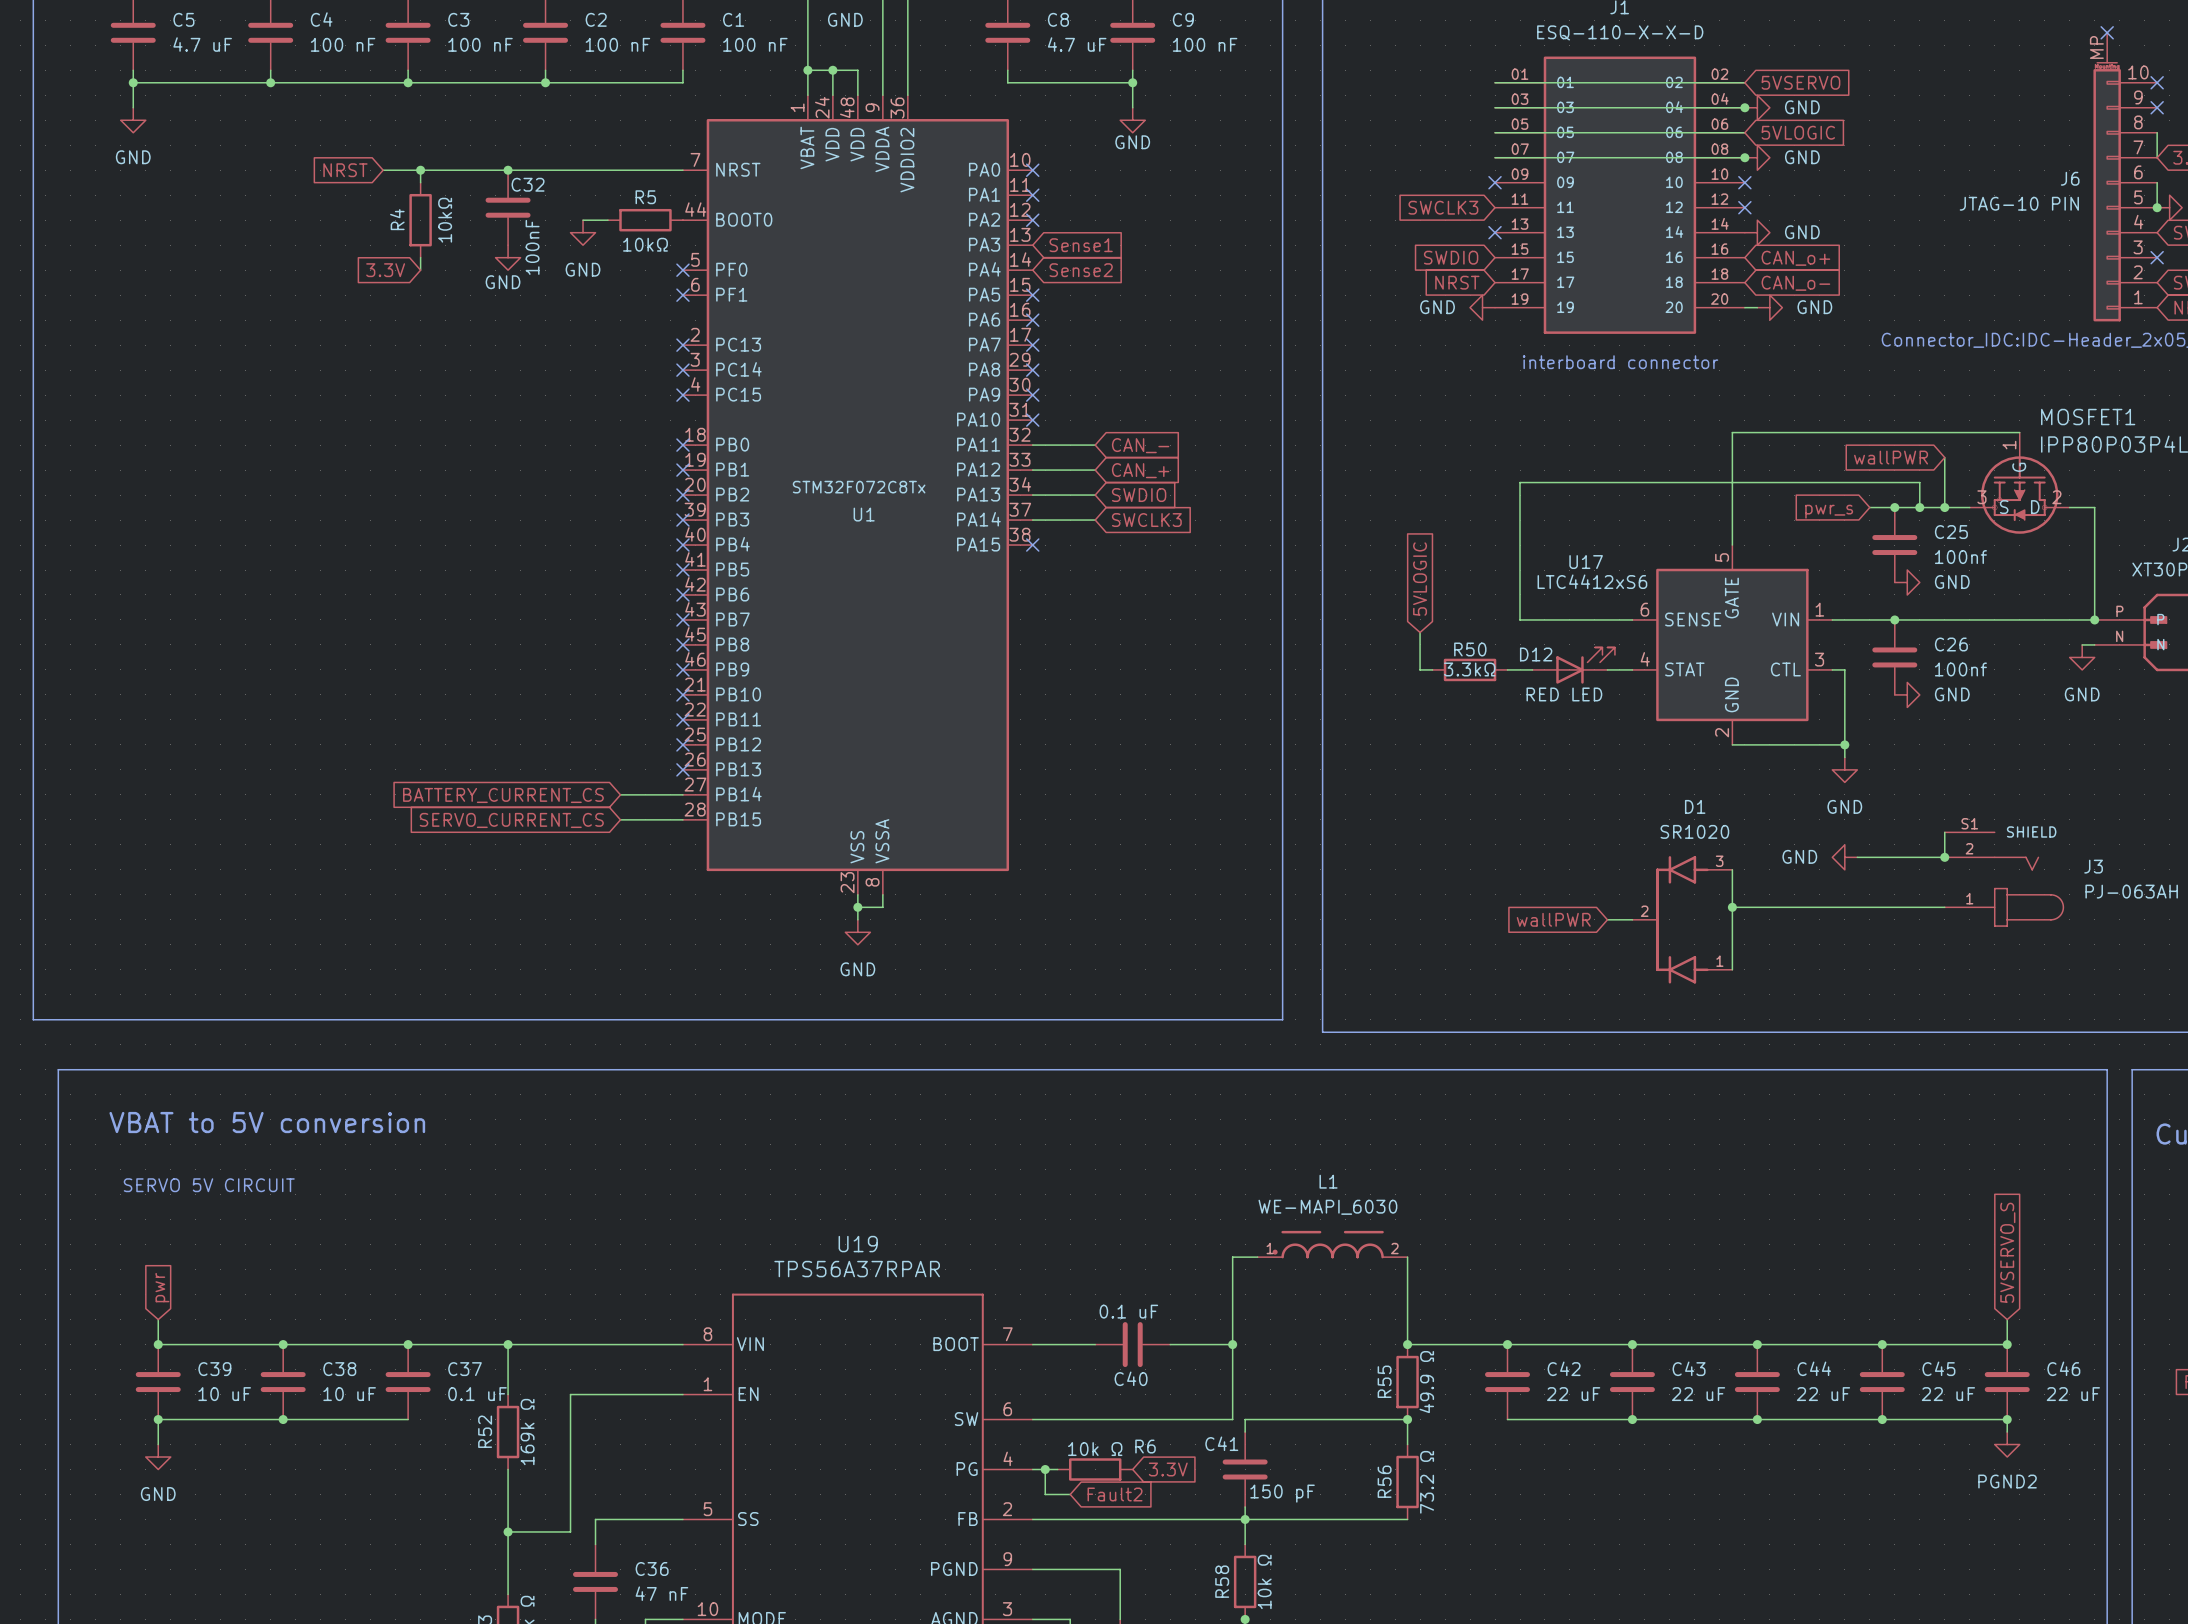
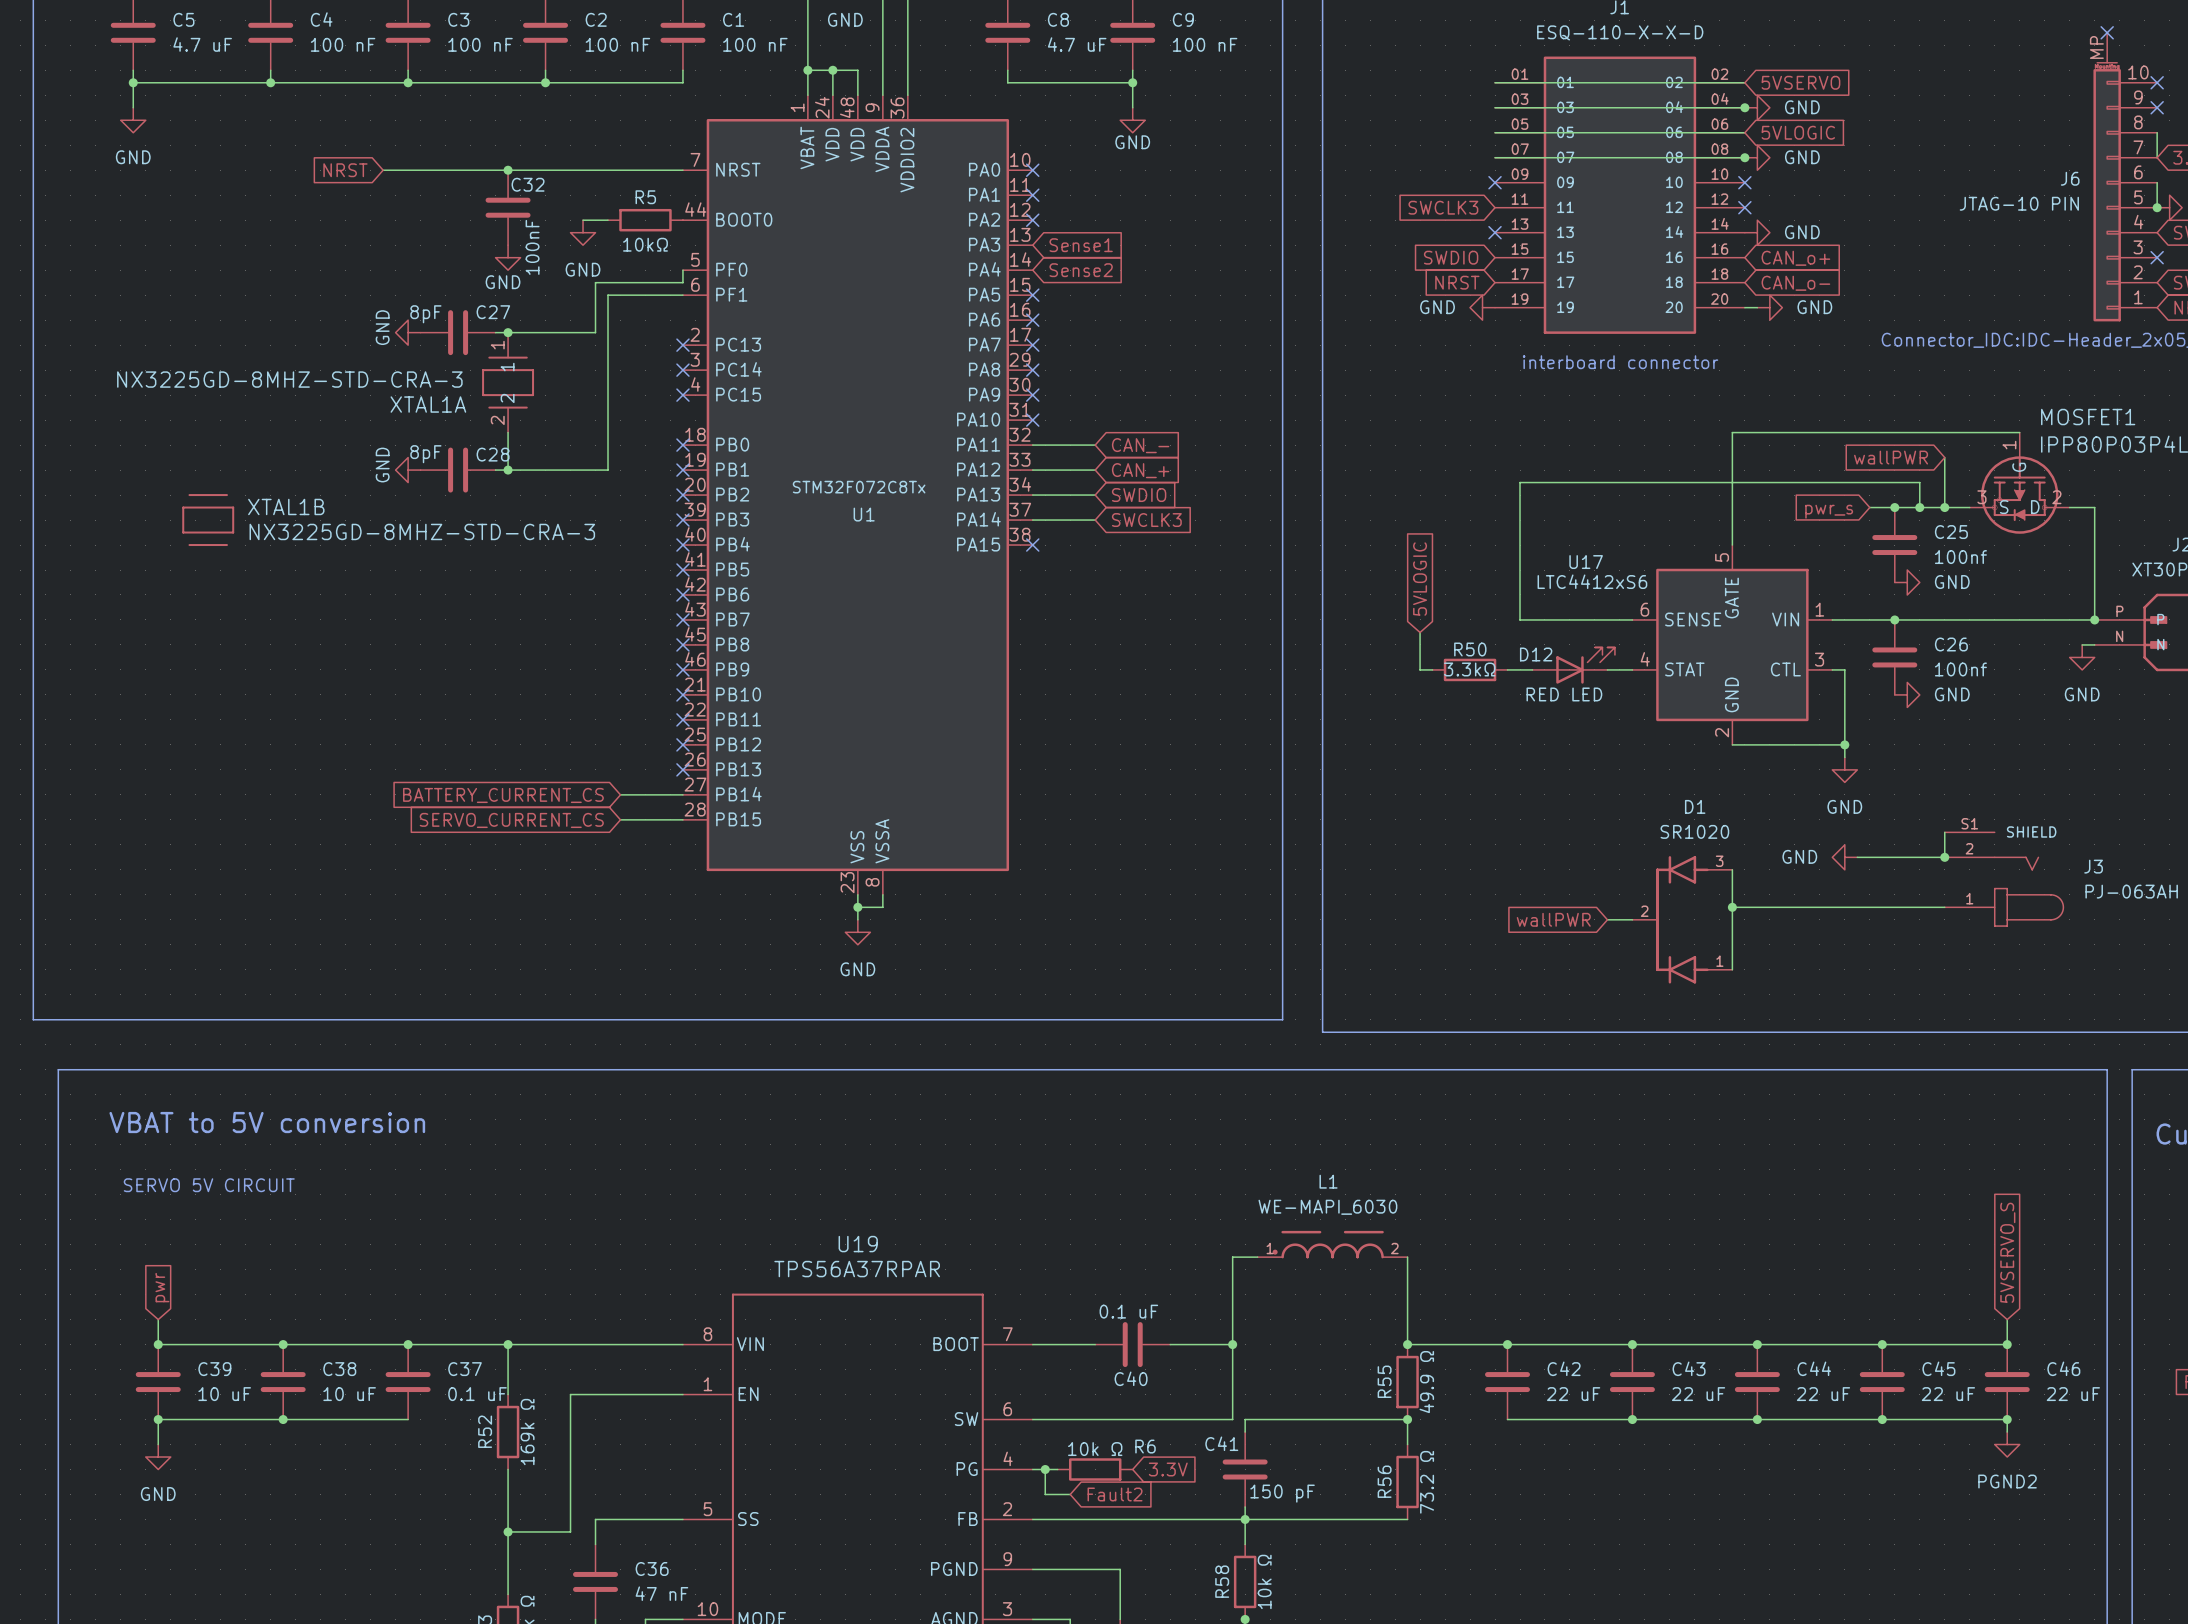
wire: (420, 170) (420, 182) -> none
junction: (420, 170) -> none
R4: 10kΩ (420, 220) -> none
wire: (420, 257) (420, 270) -> none
global label: 3.3V (385, 270) -> none
wire: none -> (682, 270) (682, 282) (595, 282) (595, 332) (495, 332)
no-connect mark: (682, 270) -> none
wire: none -> (682, 295) (608, 295) (608, 470) (495, 470)
no-connect mark: (682, 295) -> none
power symbol: none -> GND (408, 332)
C27: none -> 8pF (458, 332)
junction: none -> (508, 332)
XTAL1A: none -> NX3225GD-8MHZ-STD-CRA-3 (508, 382)
wire: none -> (508, 432) (508, 470)
power symbol: none -> GND (408, 470)
C28: none -> 8pF (458, 470)
junction: none -> (508, 470)
XTAL1B: none -> NX3225GD-8MHZ-STD-CRA-3 (208, 520)

